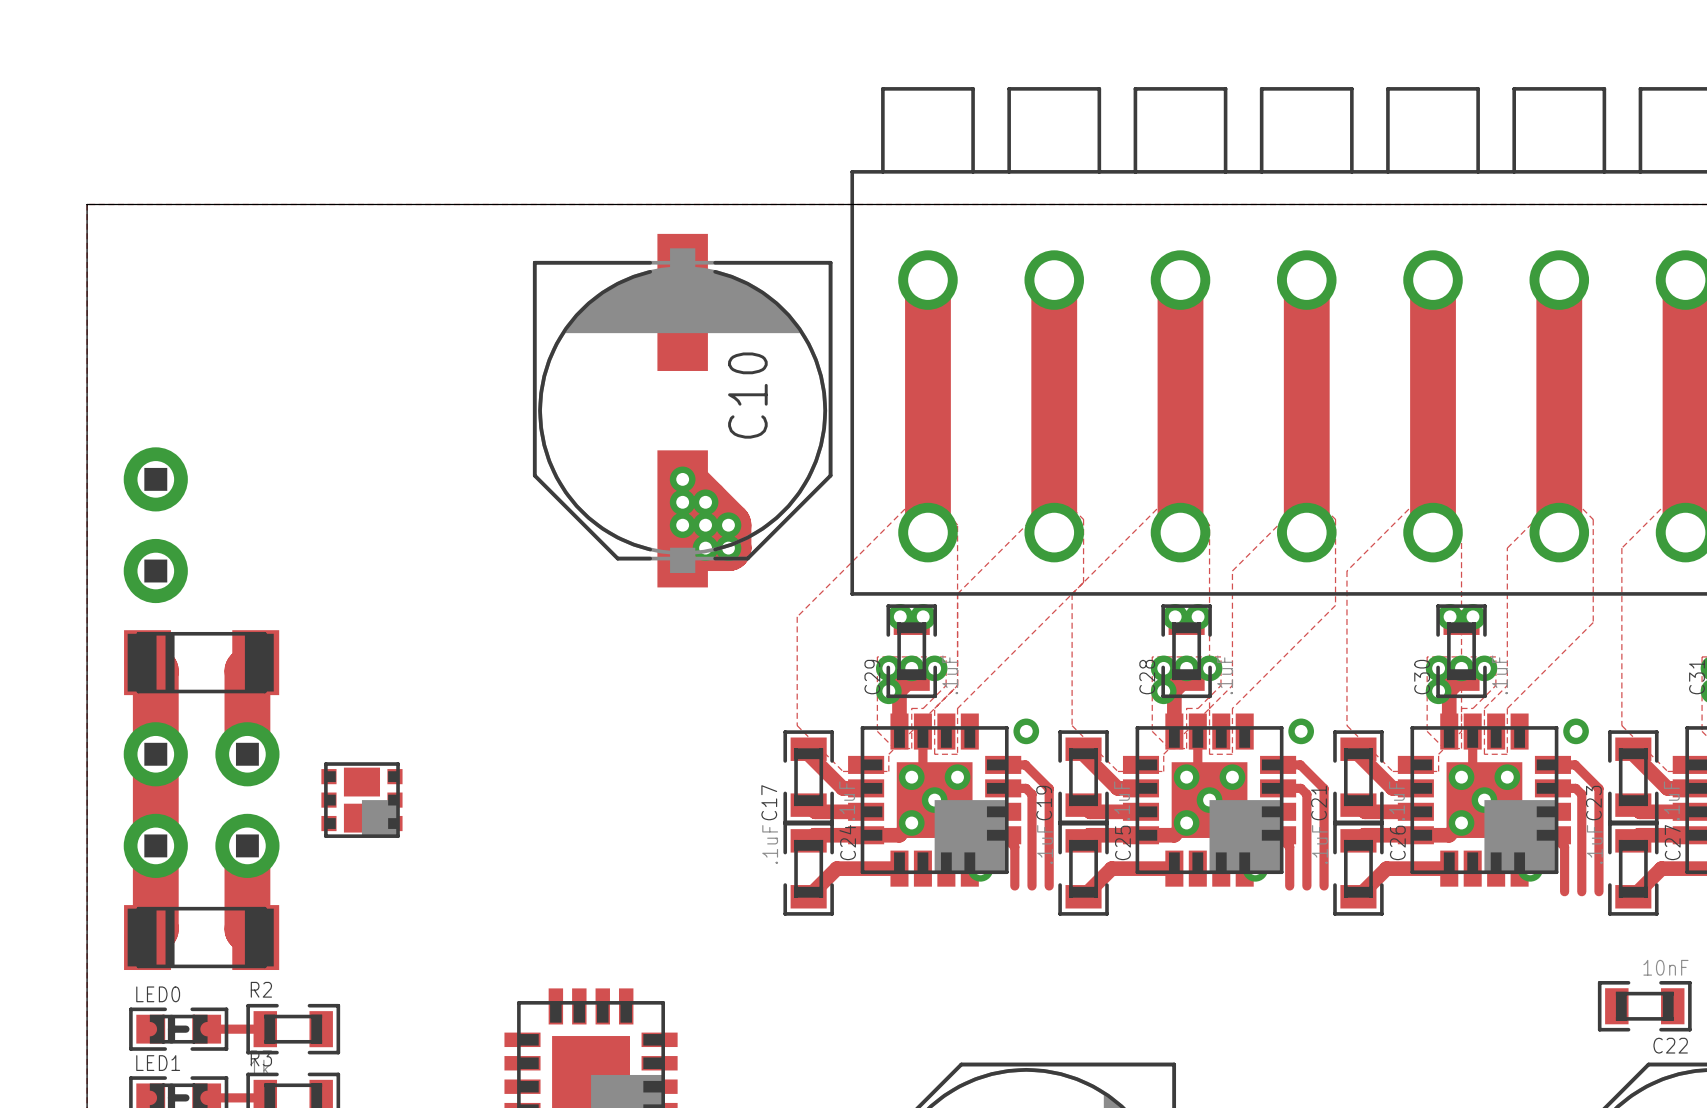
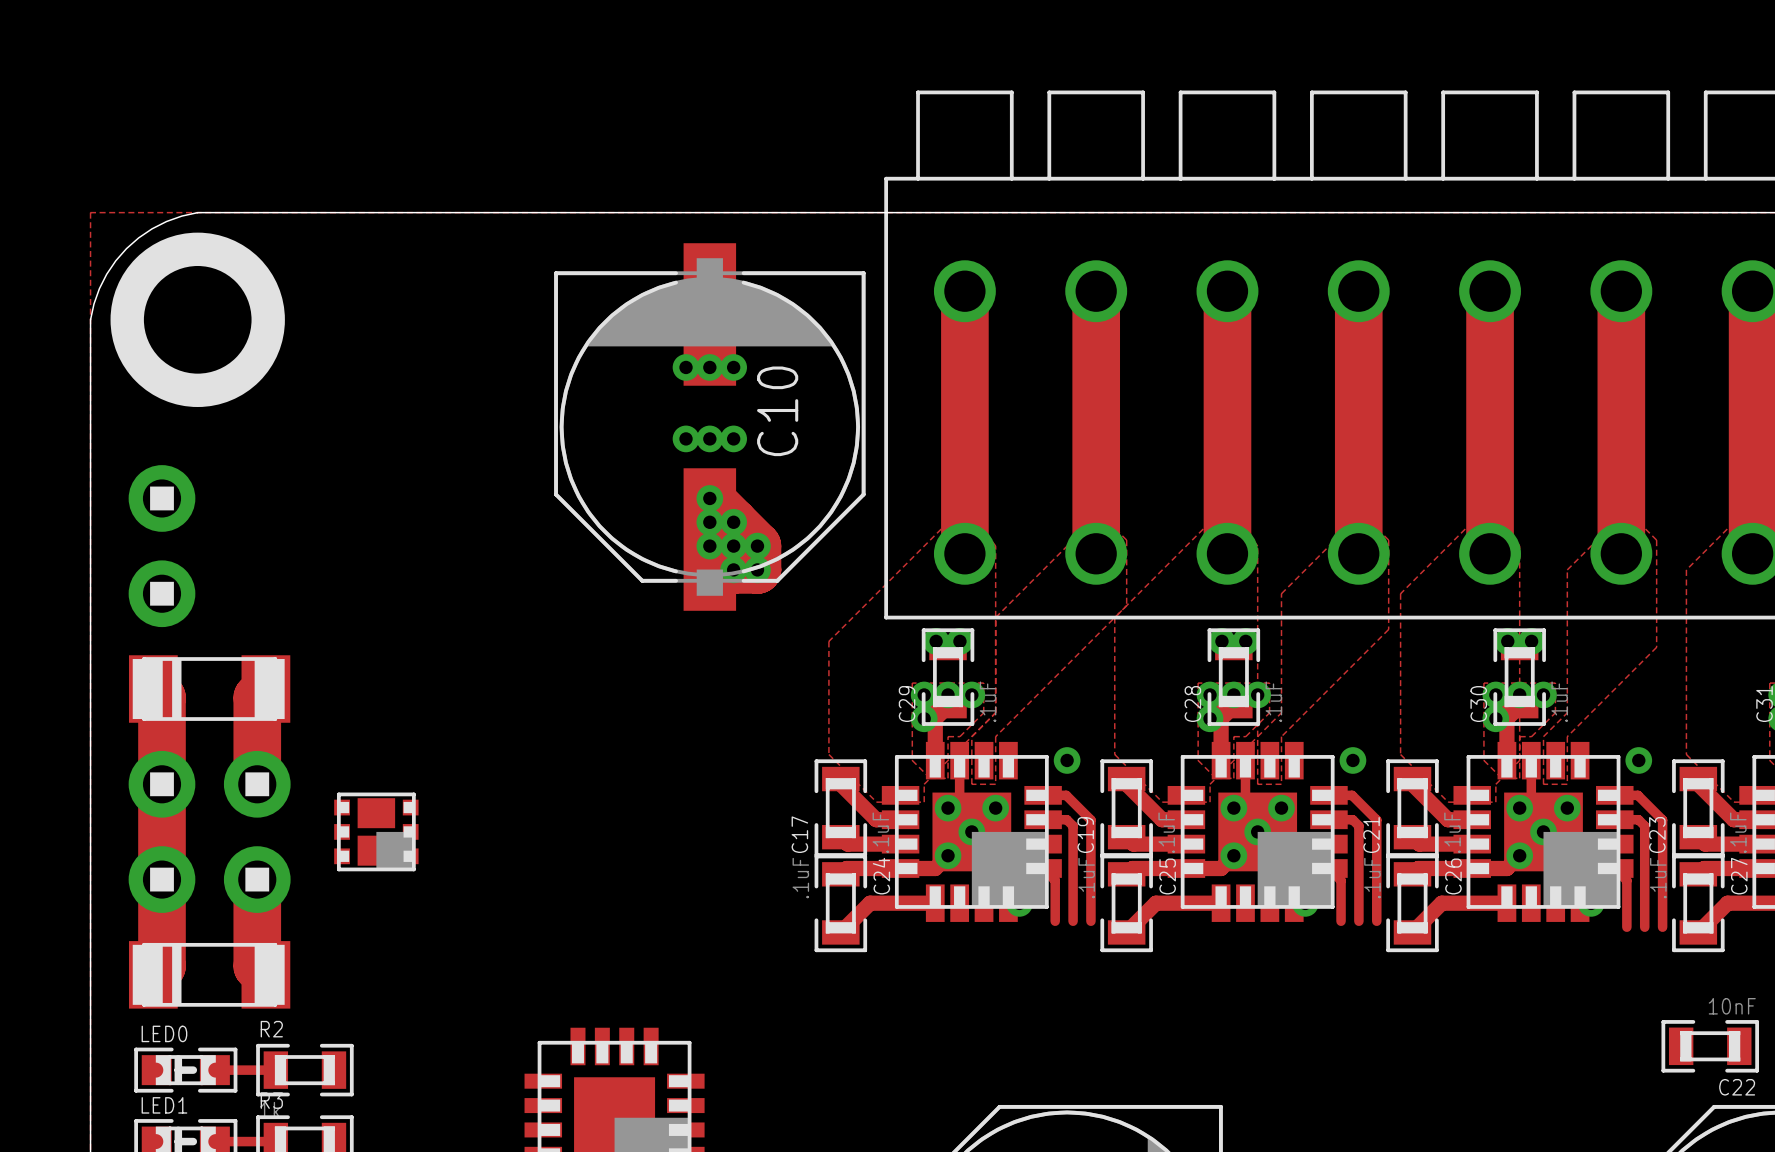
board edge: (190, 204) (87, 204) (87, 307) -> (197, 212) (166, 221) (138, 237) (126, 248) (115, 260) (99, 288) (90, 319)
part: none -> (197, 319)
via: none -> (686, 367)
via: none -> (709, 367)
via: none -> (733, 367)
via: none -> (686, 438)
via: none -> (709, 438)
via: none -> (733, 438)

